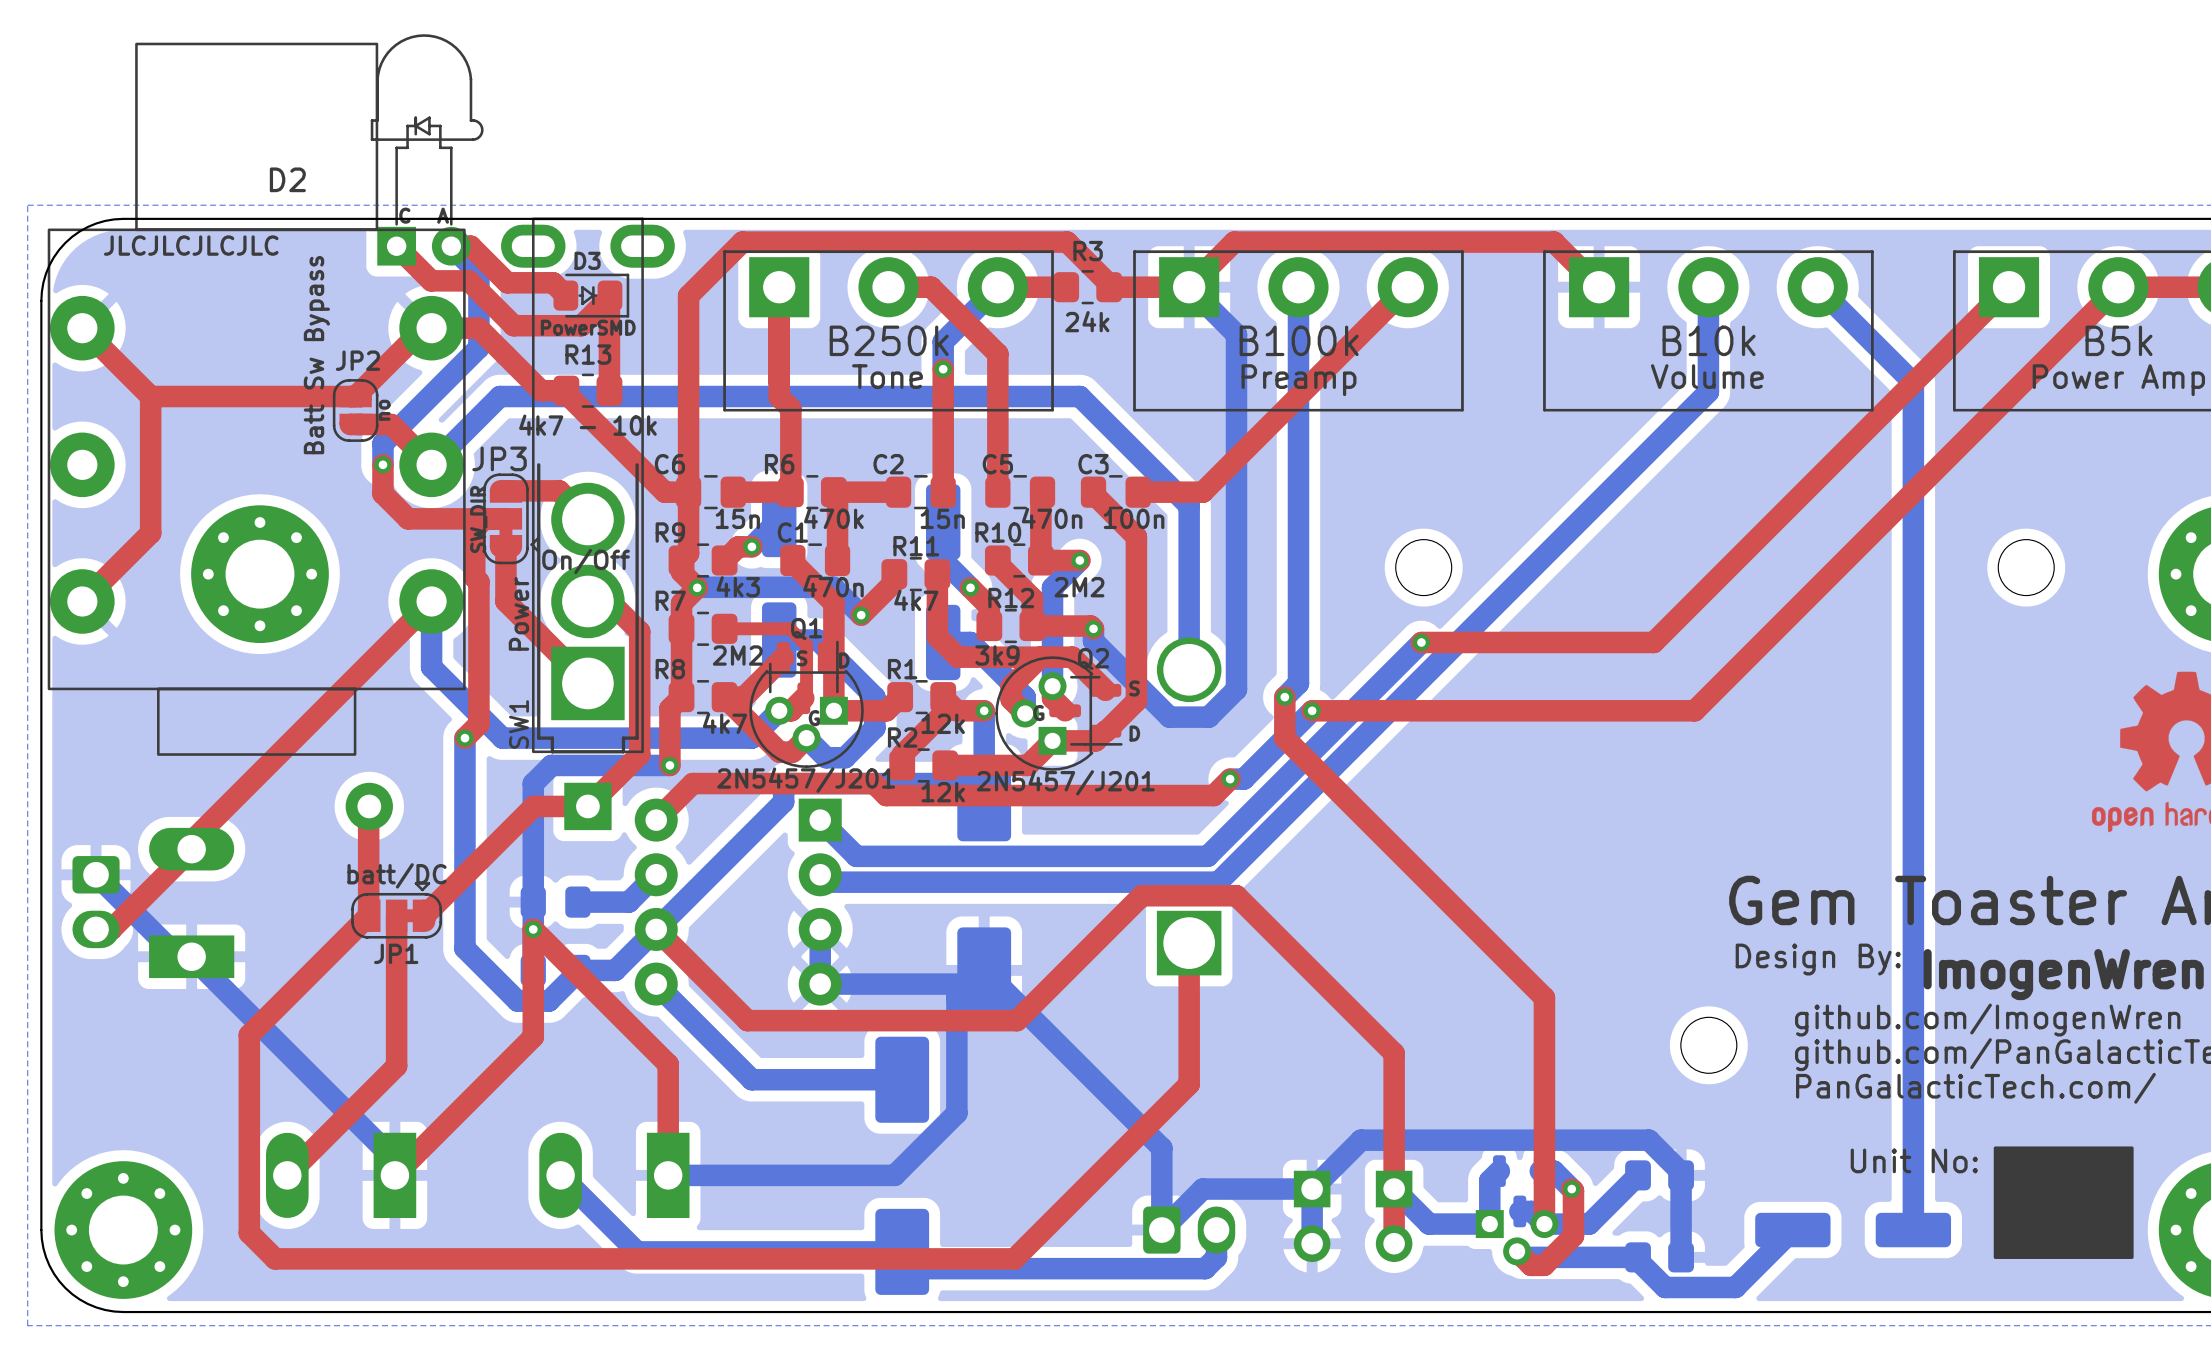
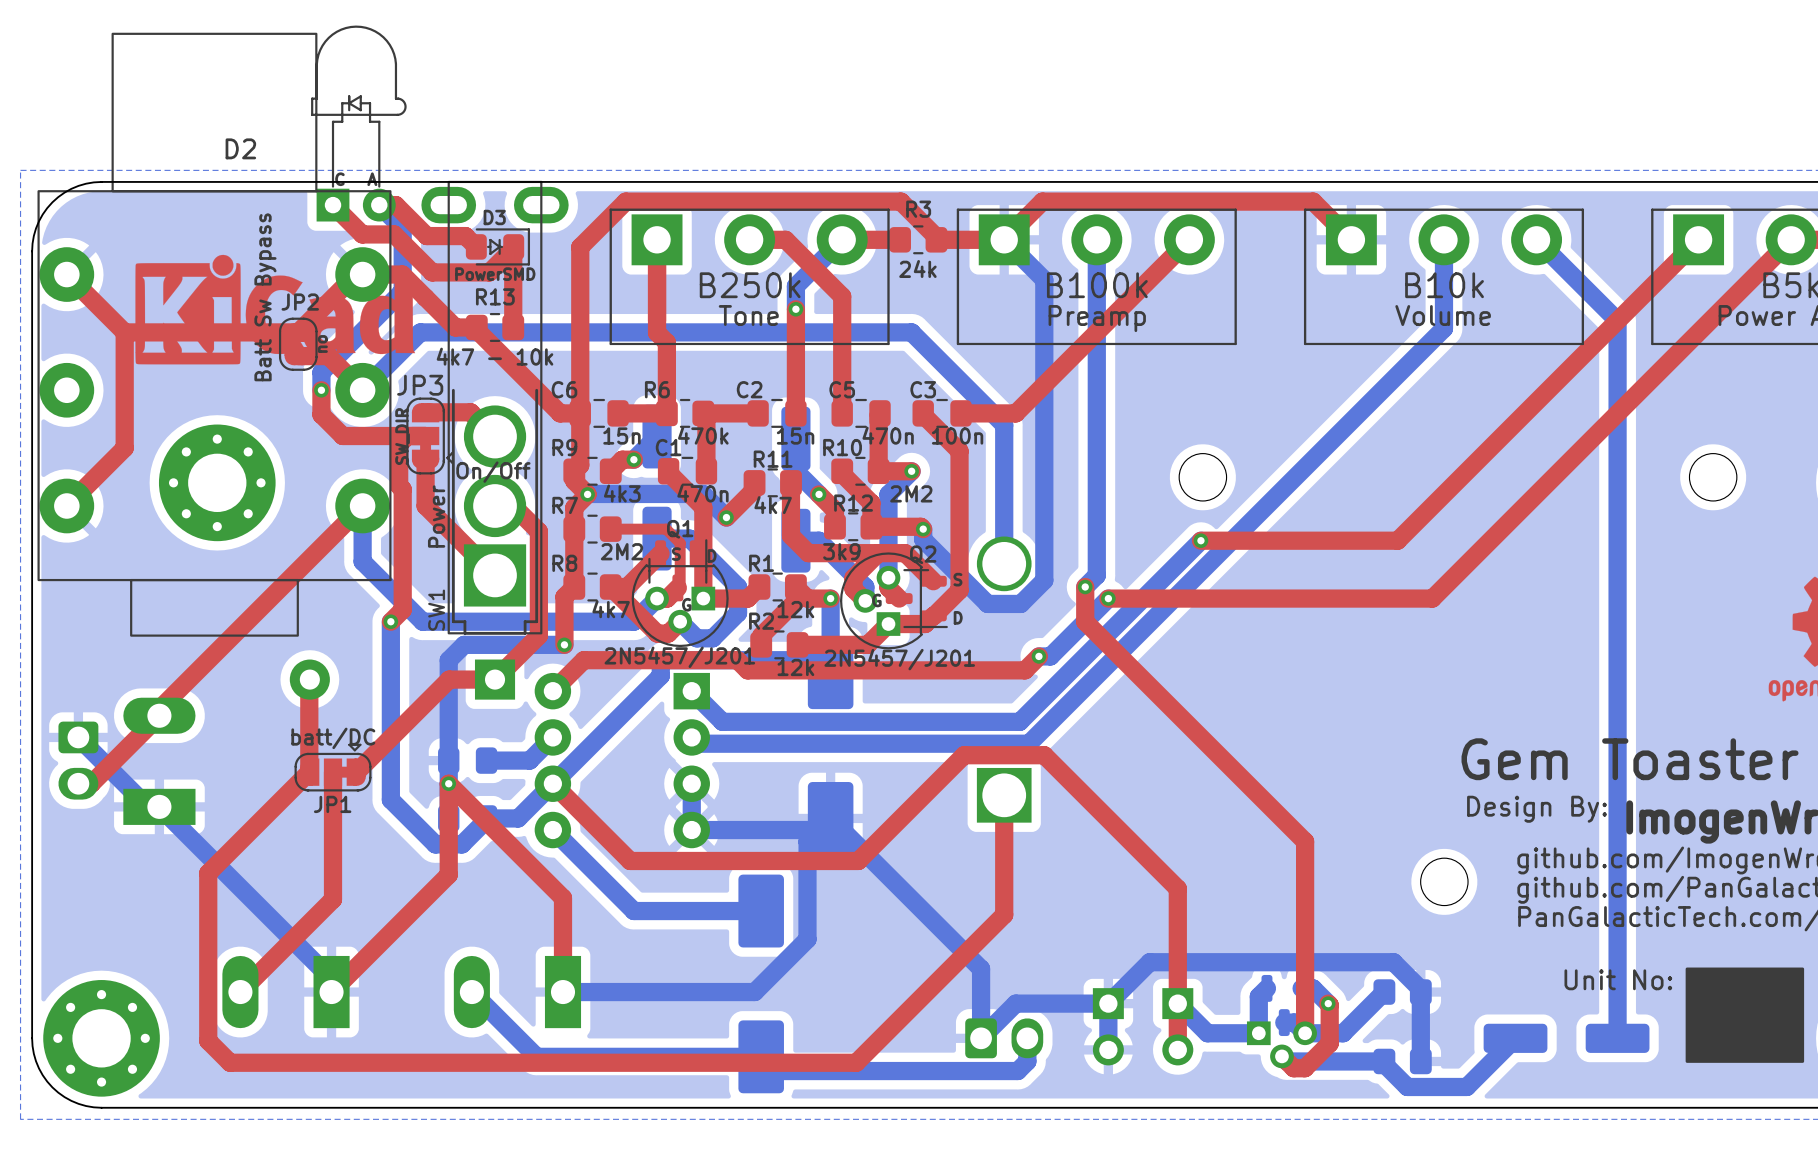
text: JLCJLCJLCJLC (191, 245) -> none
drawing: none -> [135, 254, 416, 365]

